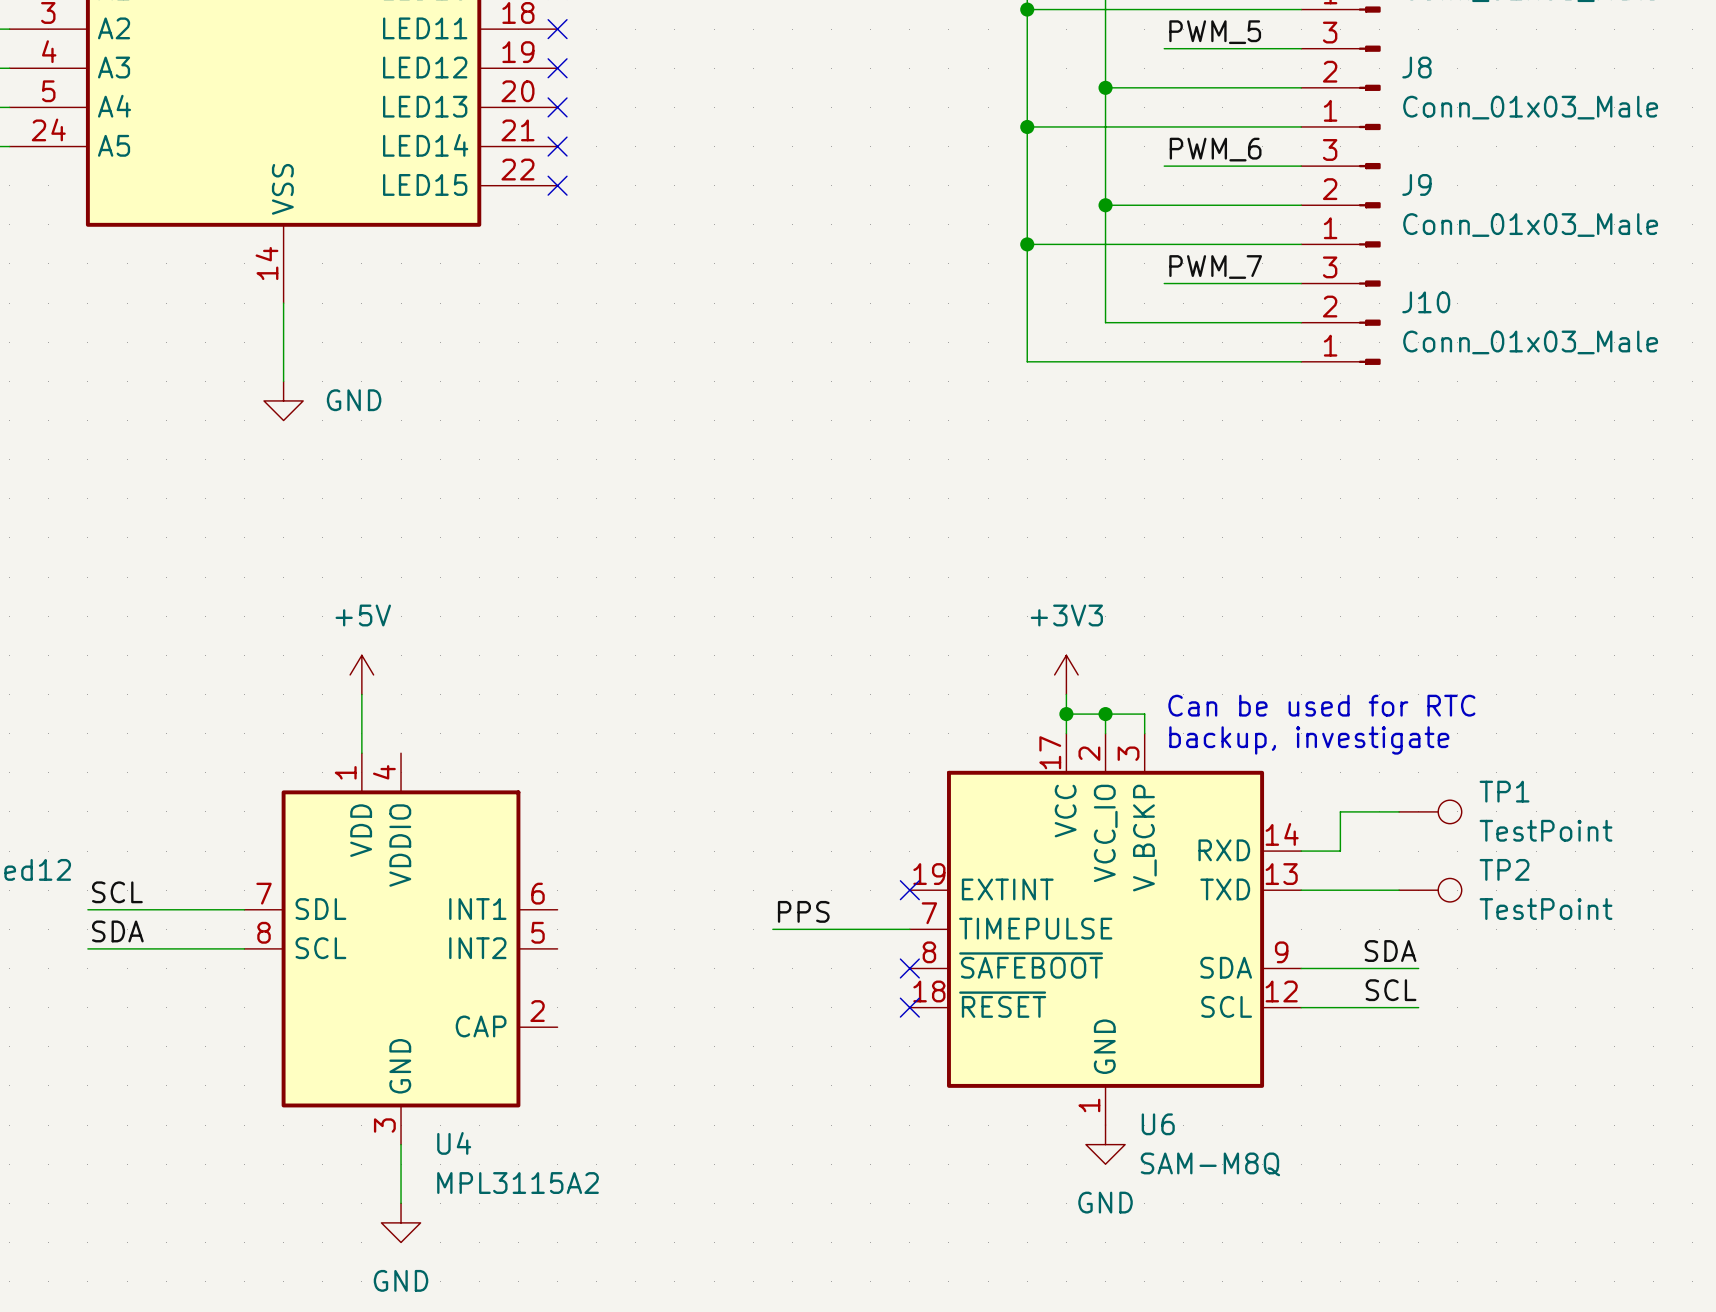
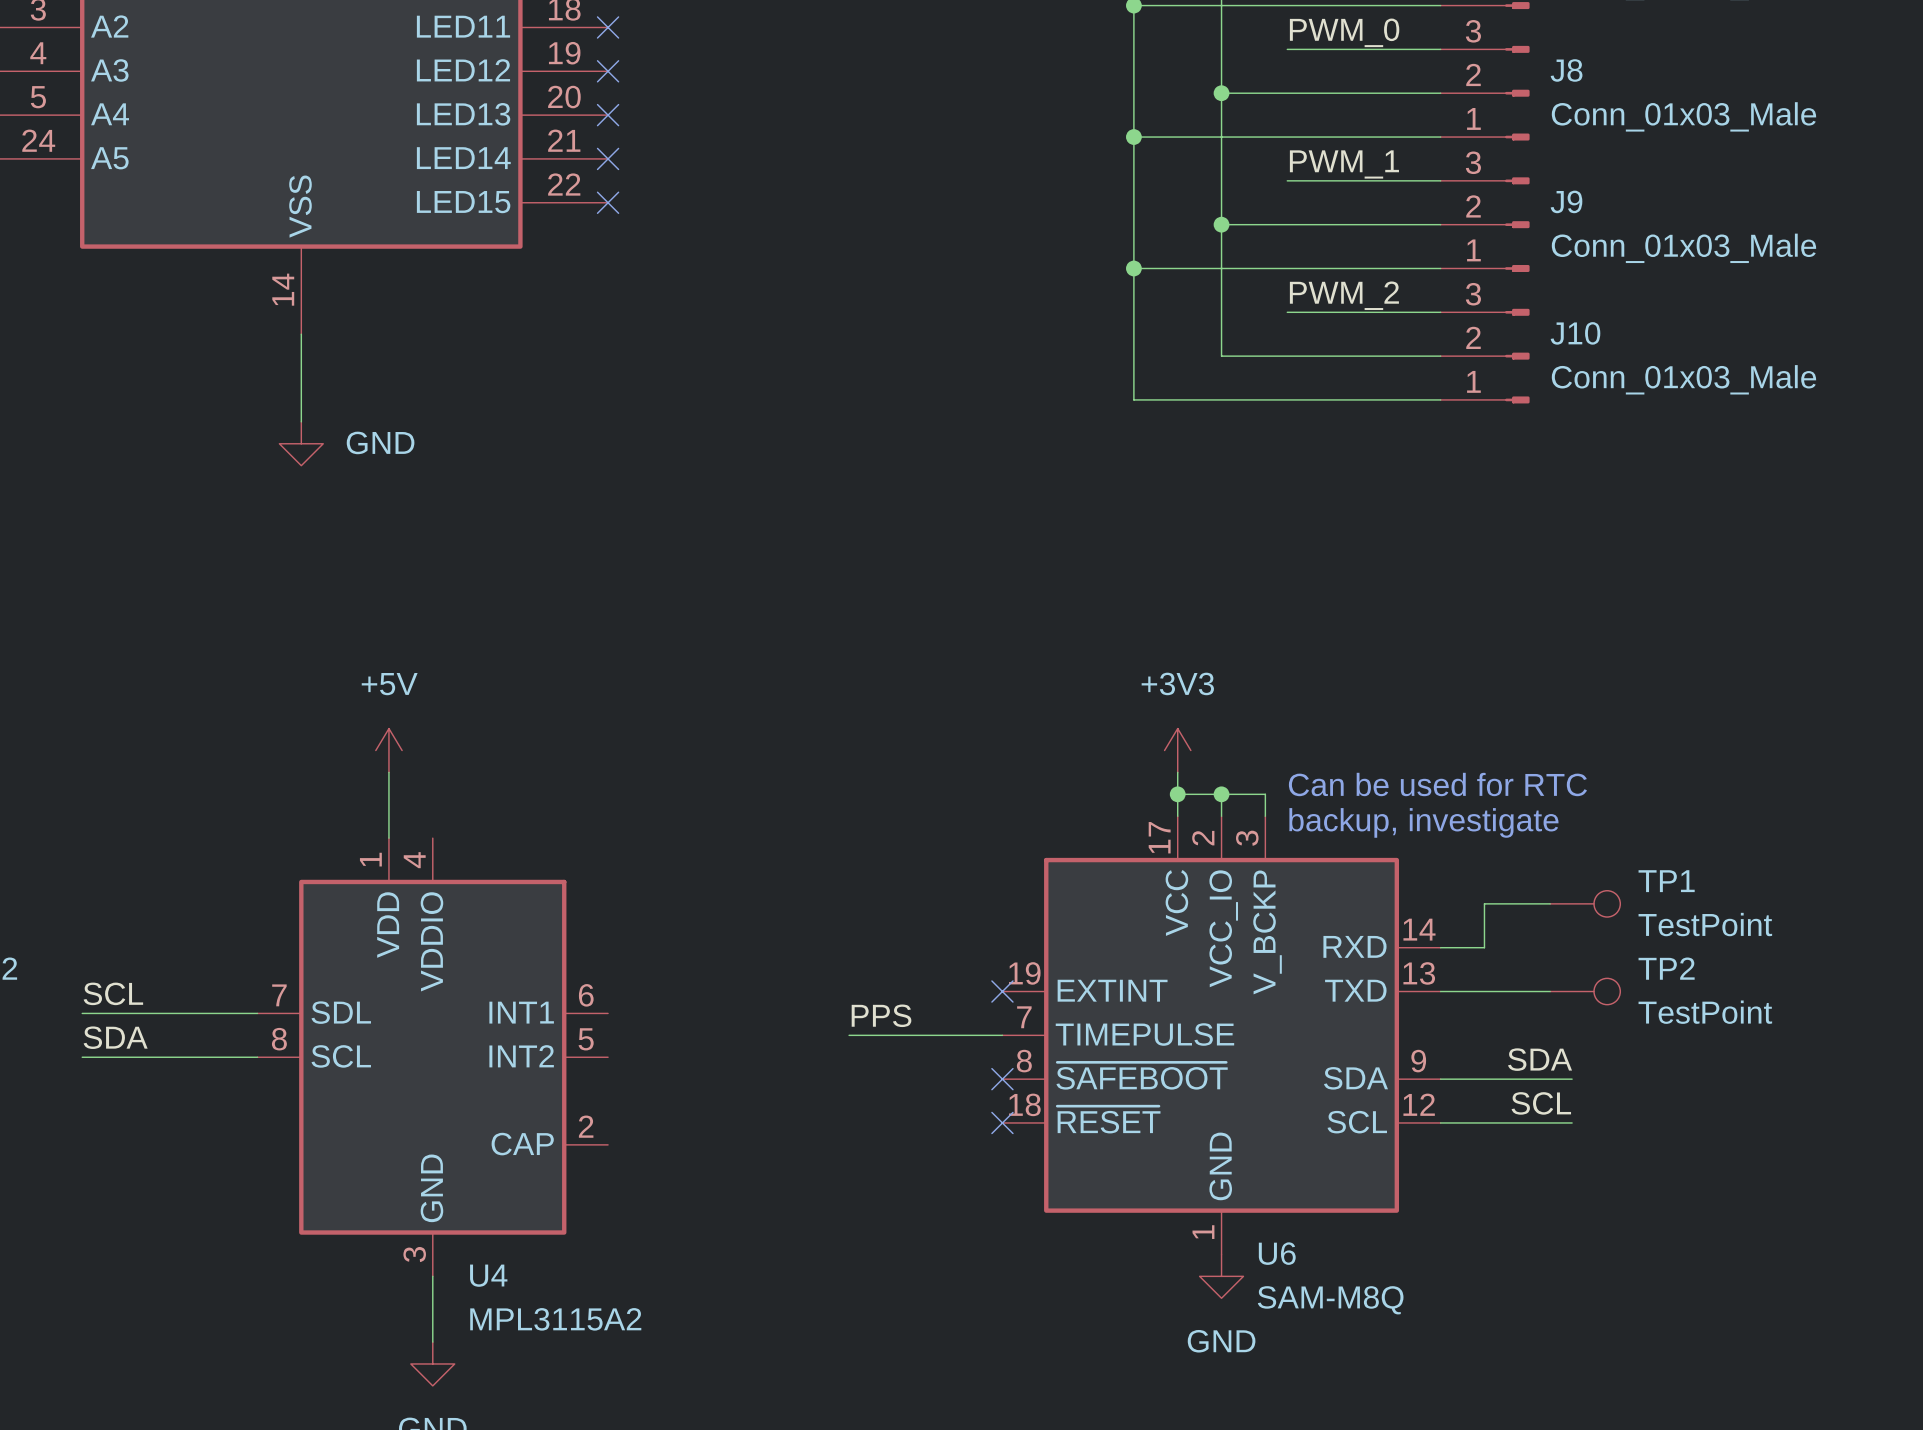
label: PWM_5 (1215, 32) -> PWM_0 (1344, 32)
label: PWM_6 (1215, 149) -> PWM_1 (1344, 164)
label: PWM_7 (1215, 267) -> PWM_2 (1344, 295)

